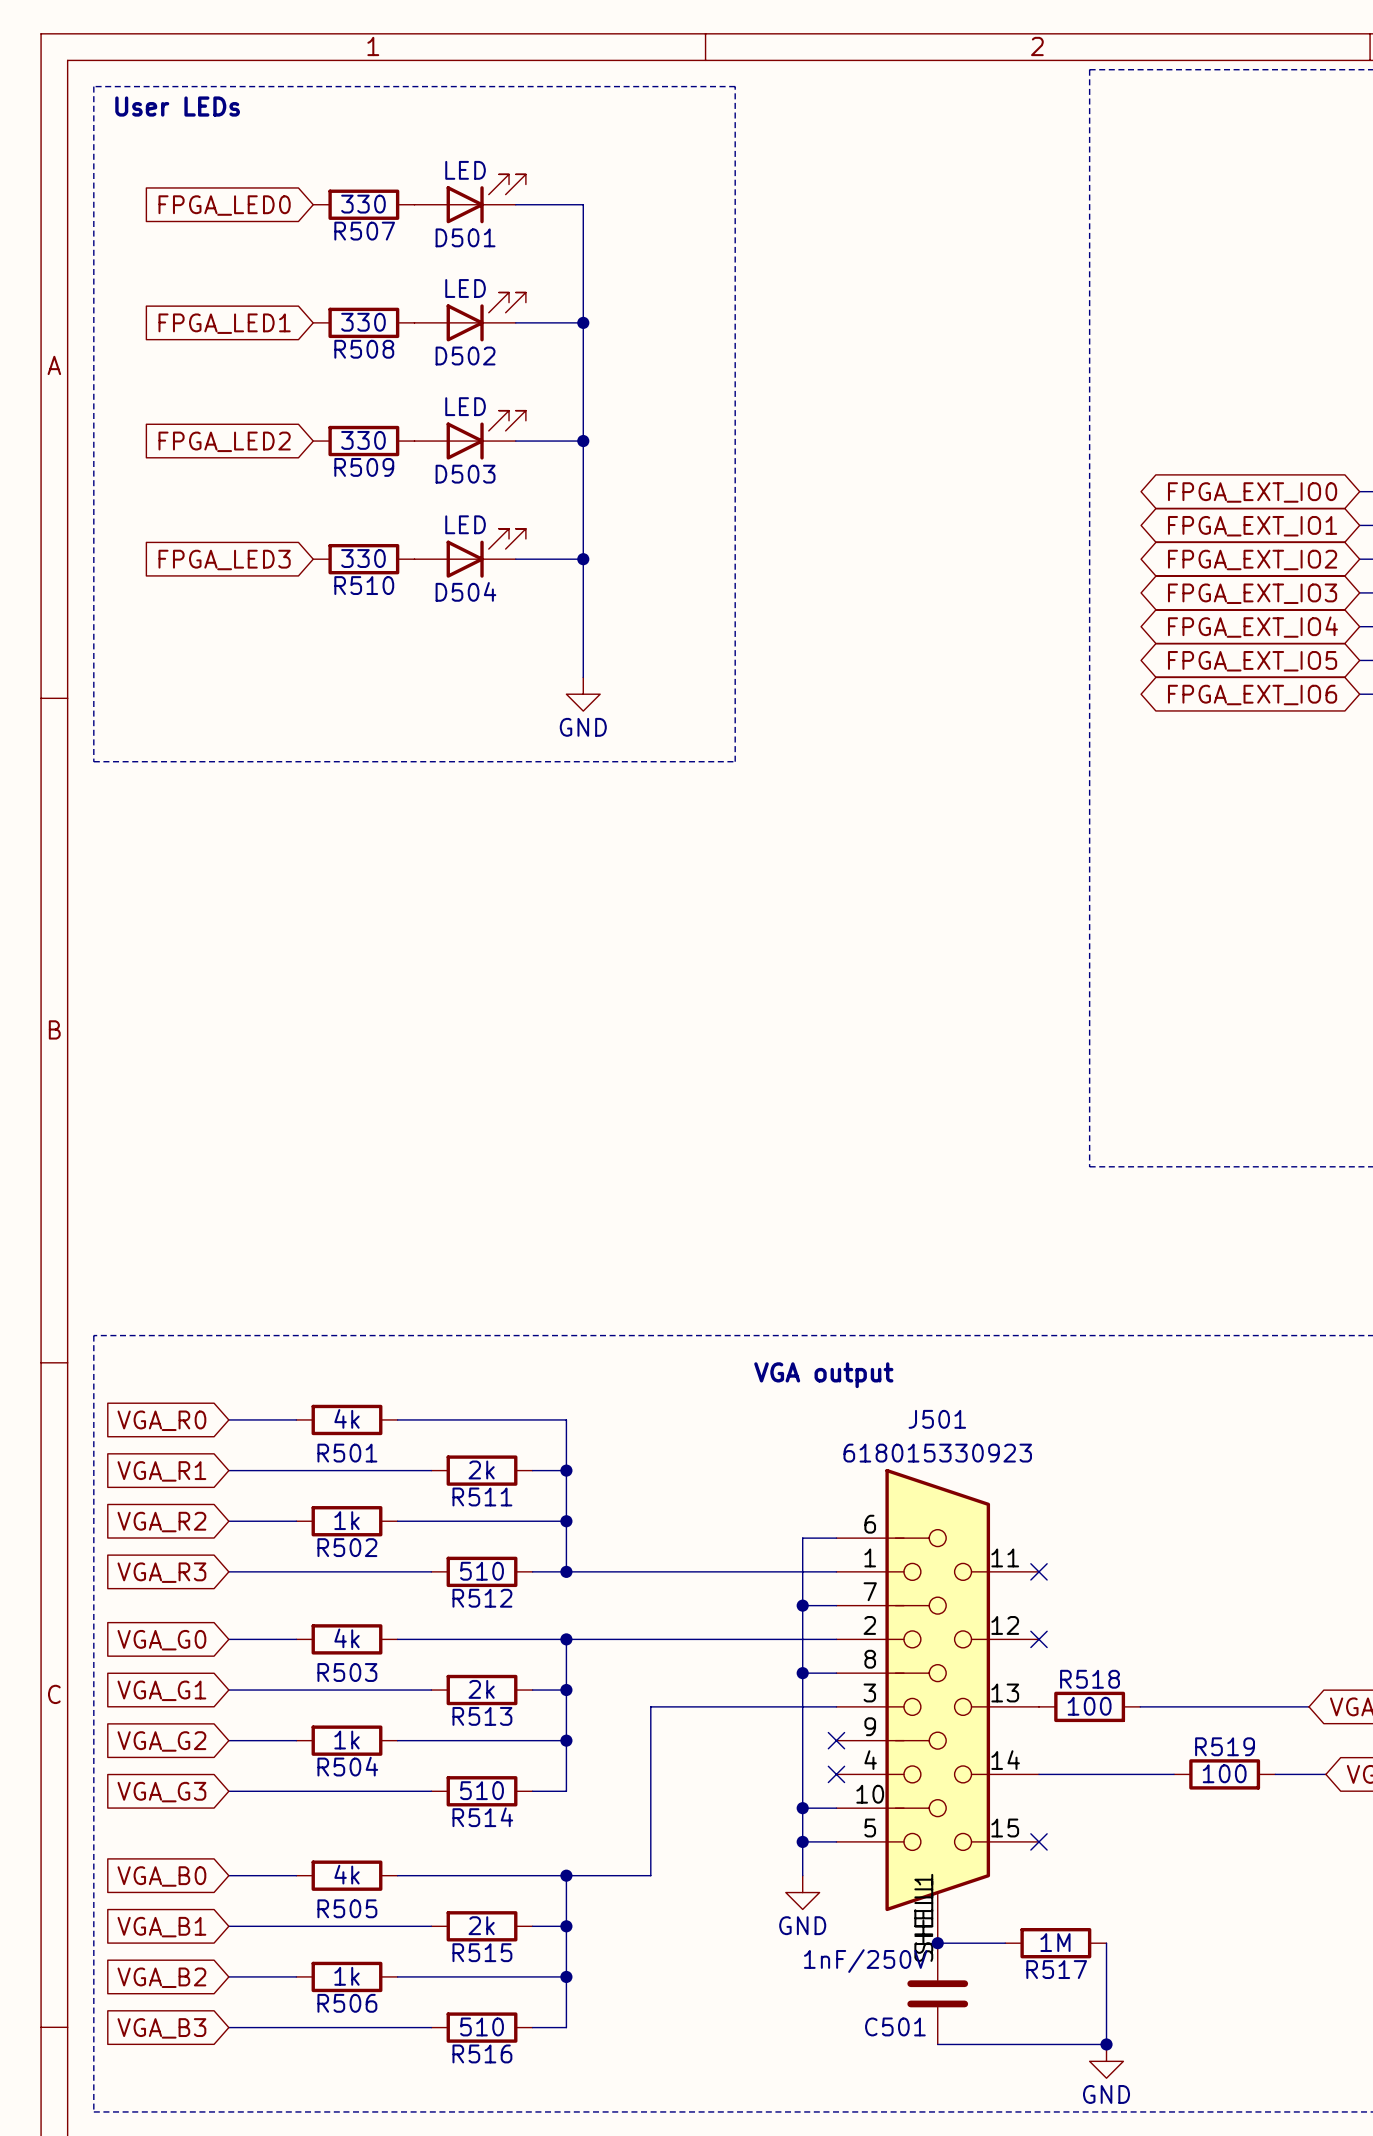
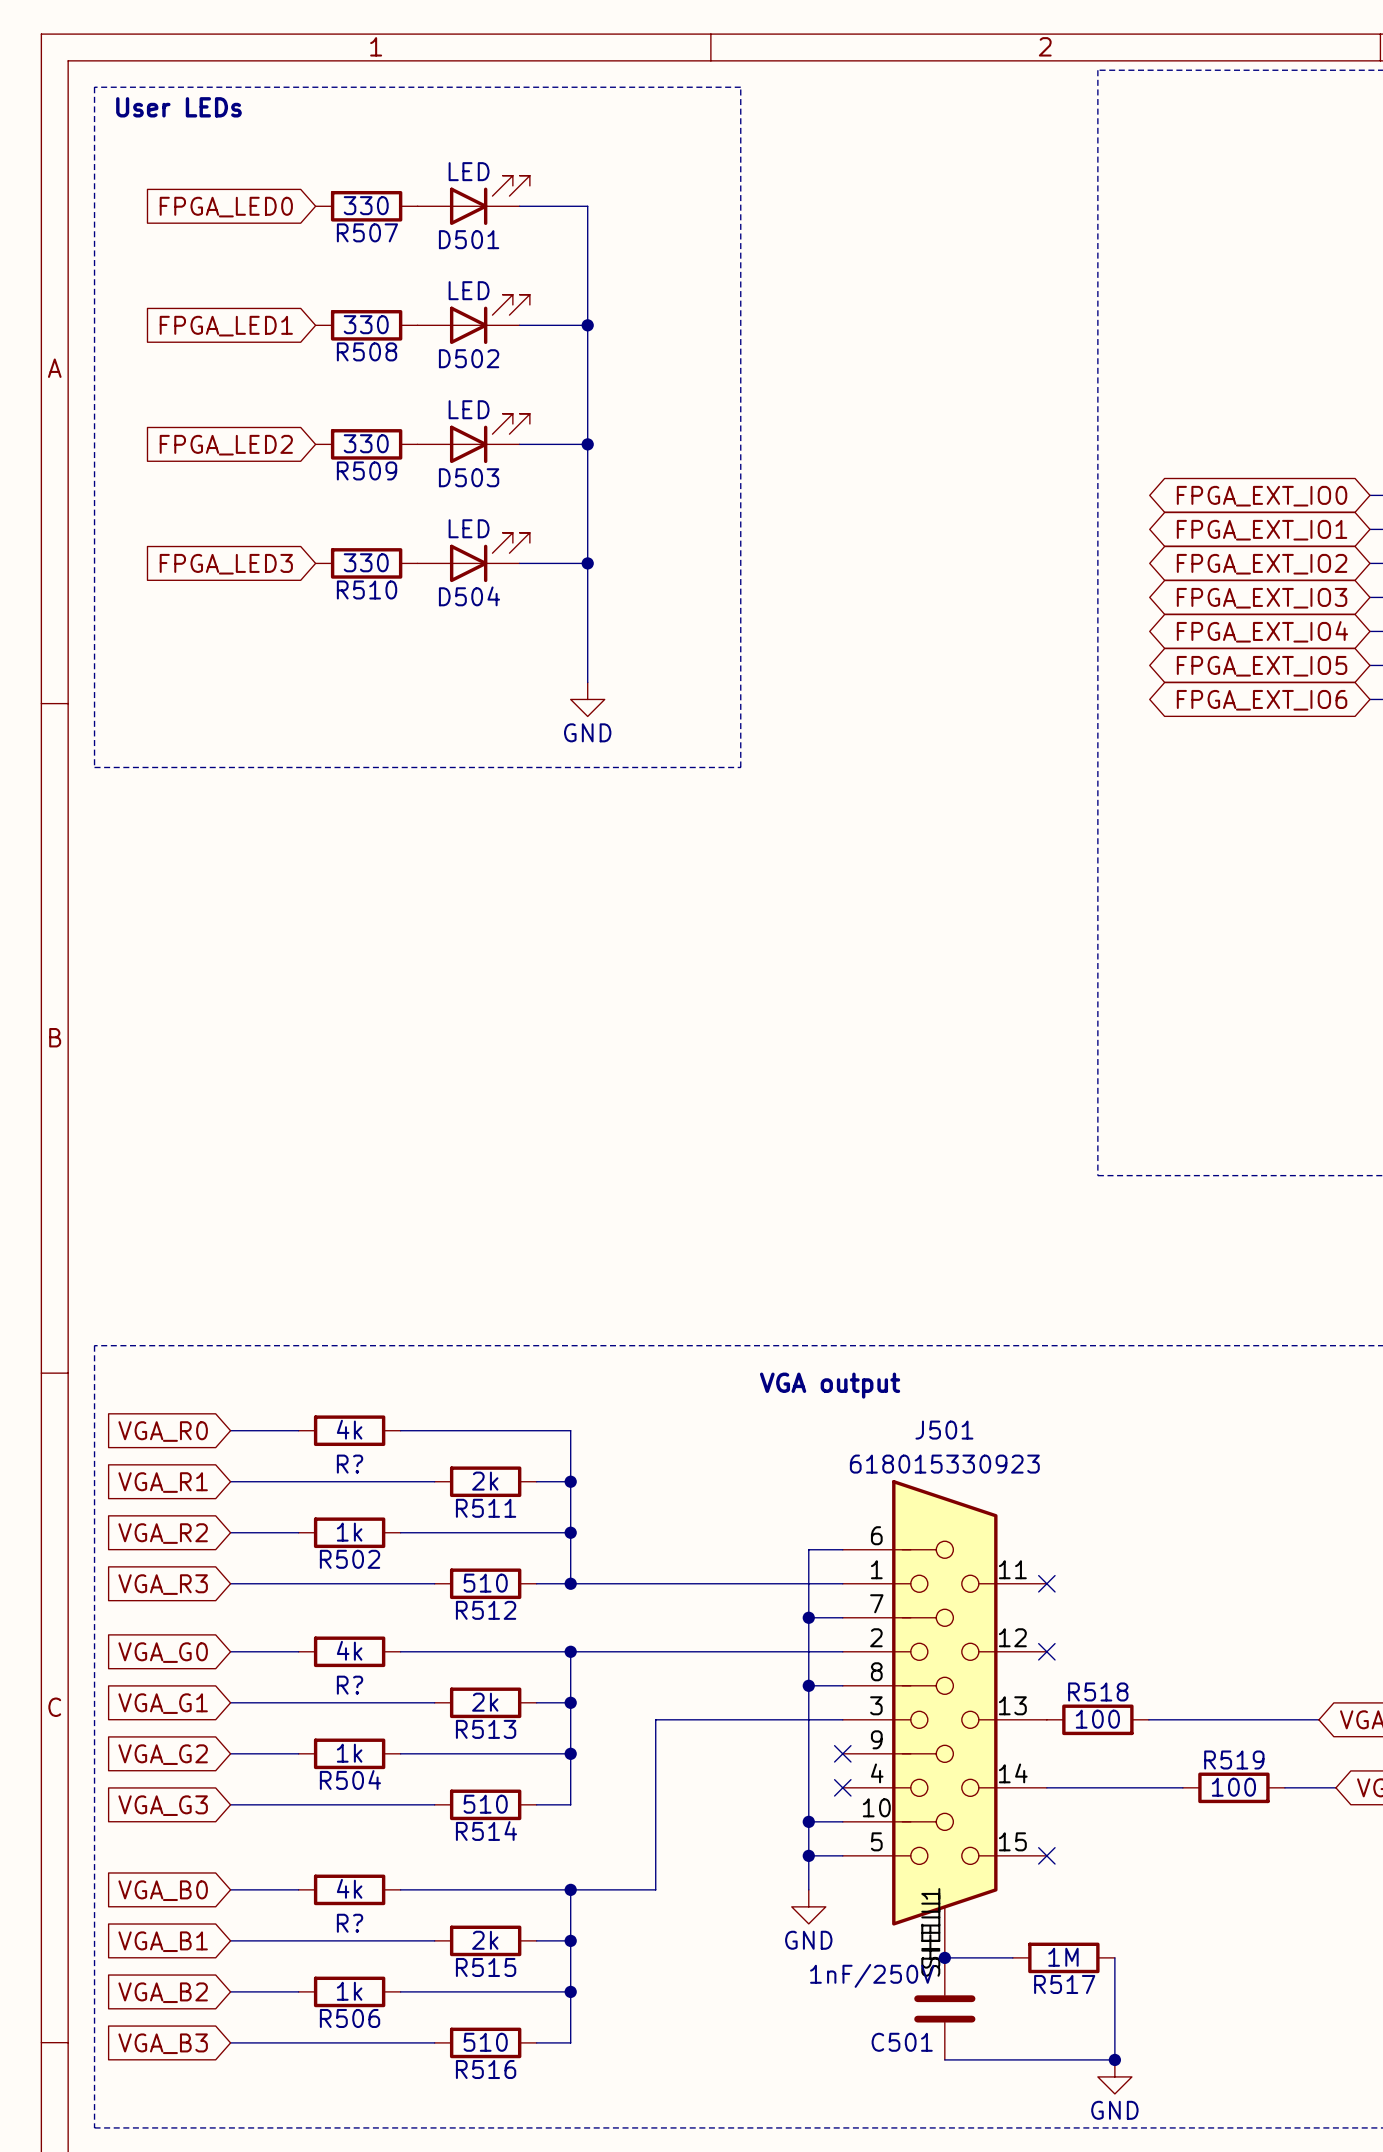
R501 name: R501 (347, 1453) -> R? (350, 1464)
R503 name: R503 (347, 1672) -> R? (350, 1685)
R505 name: R505 (347, 1908) -> R? (350, 1923)

